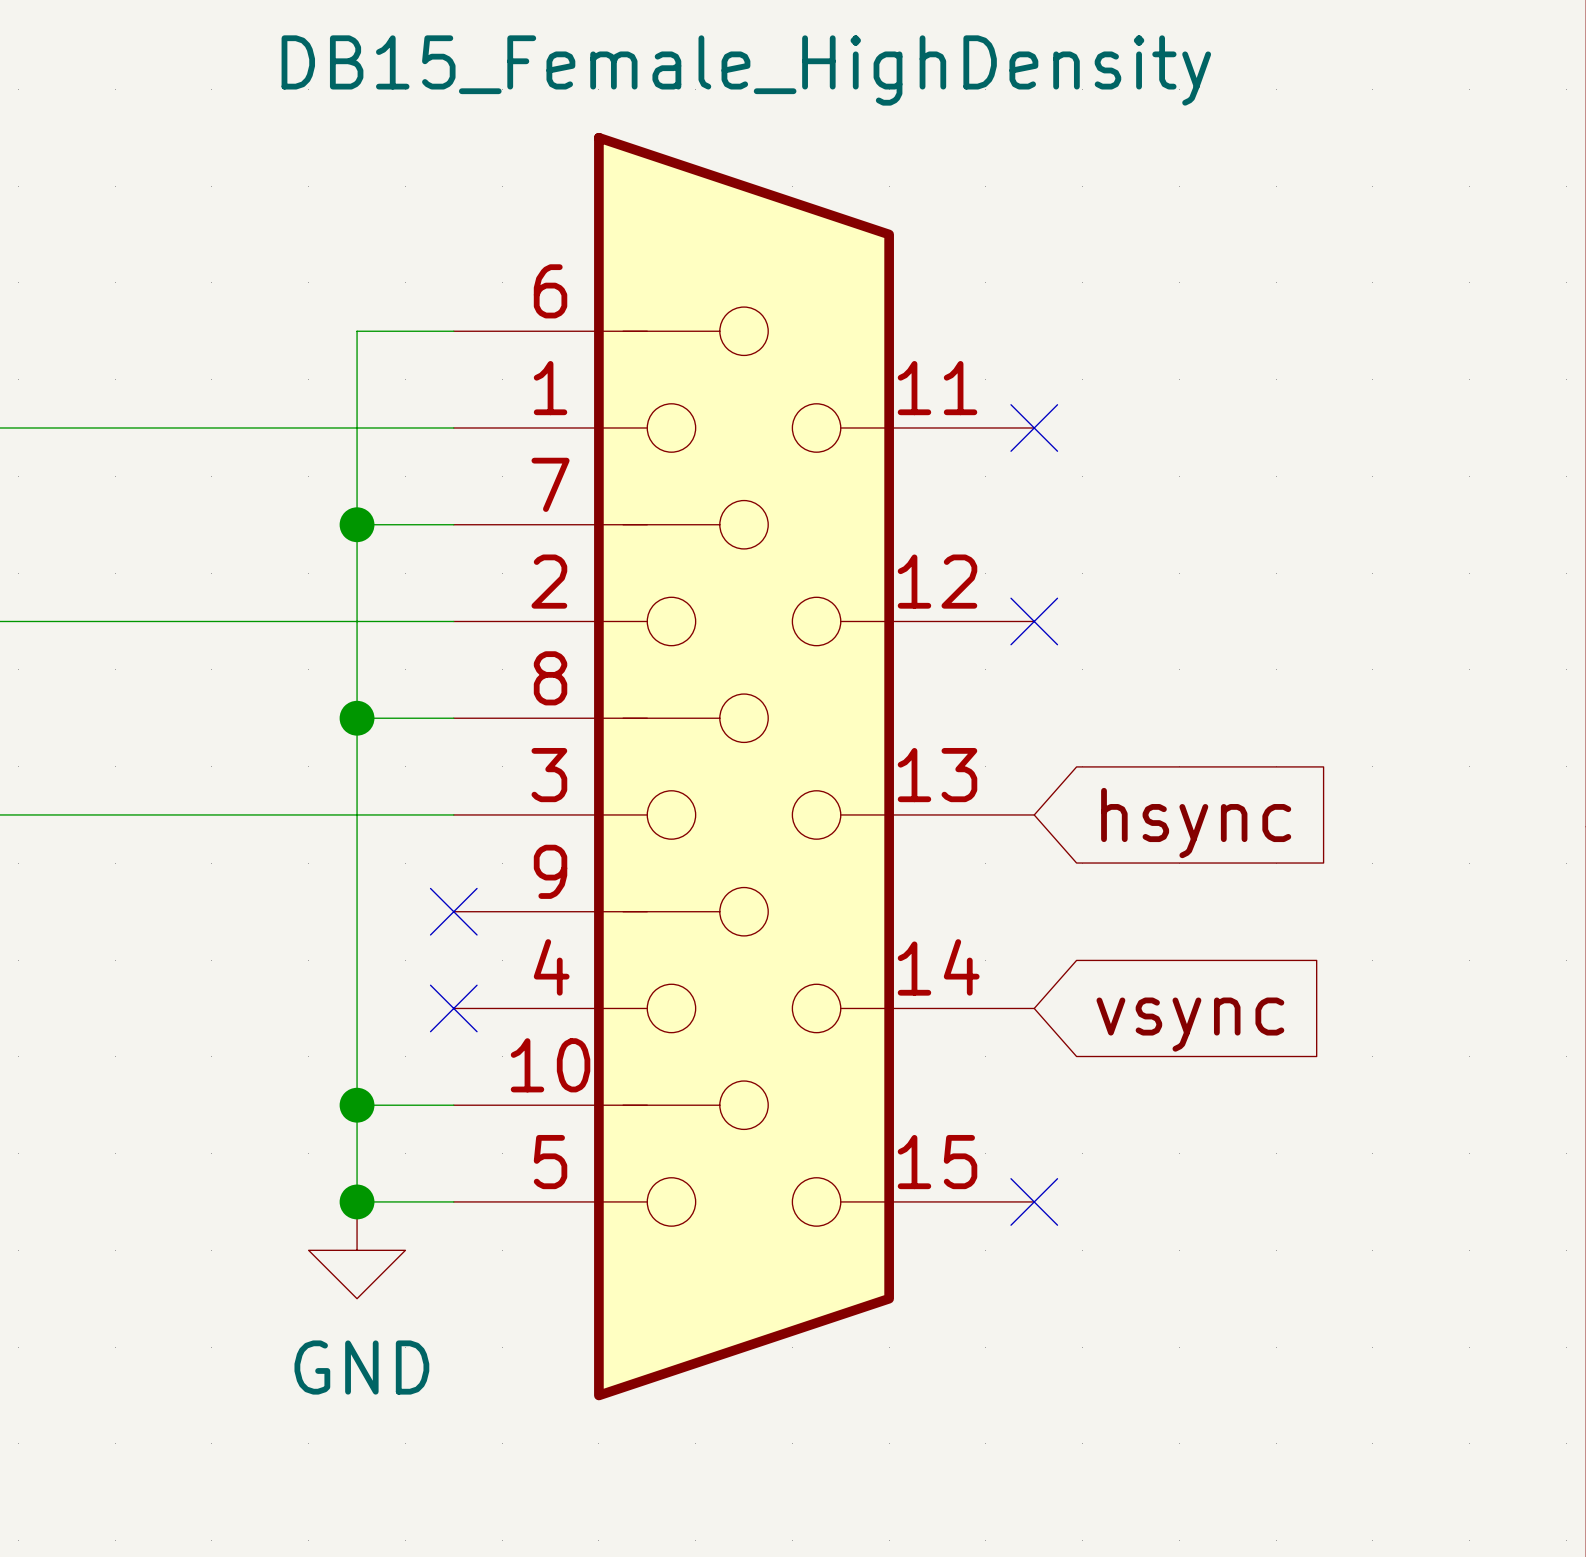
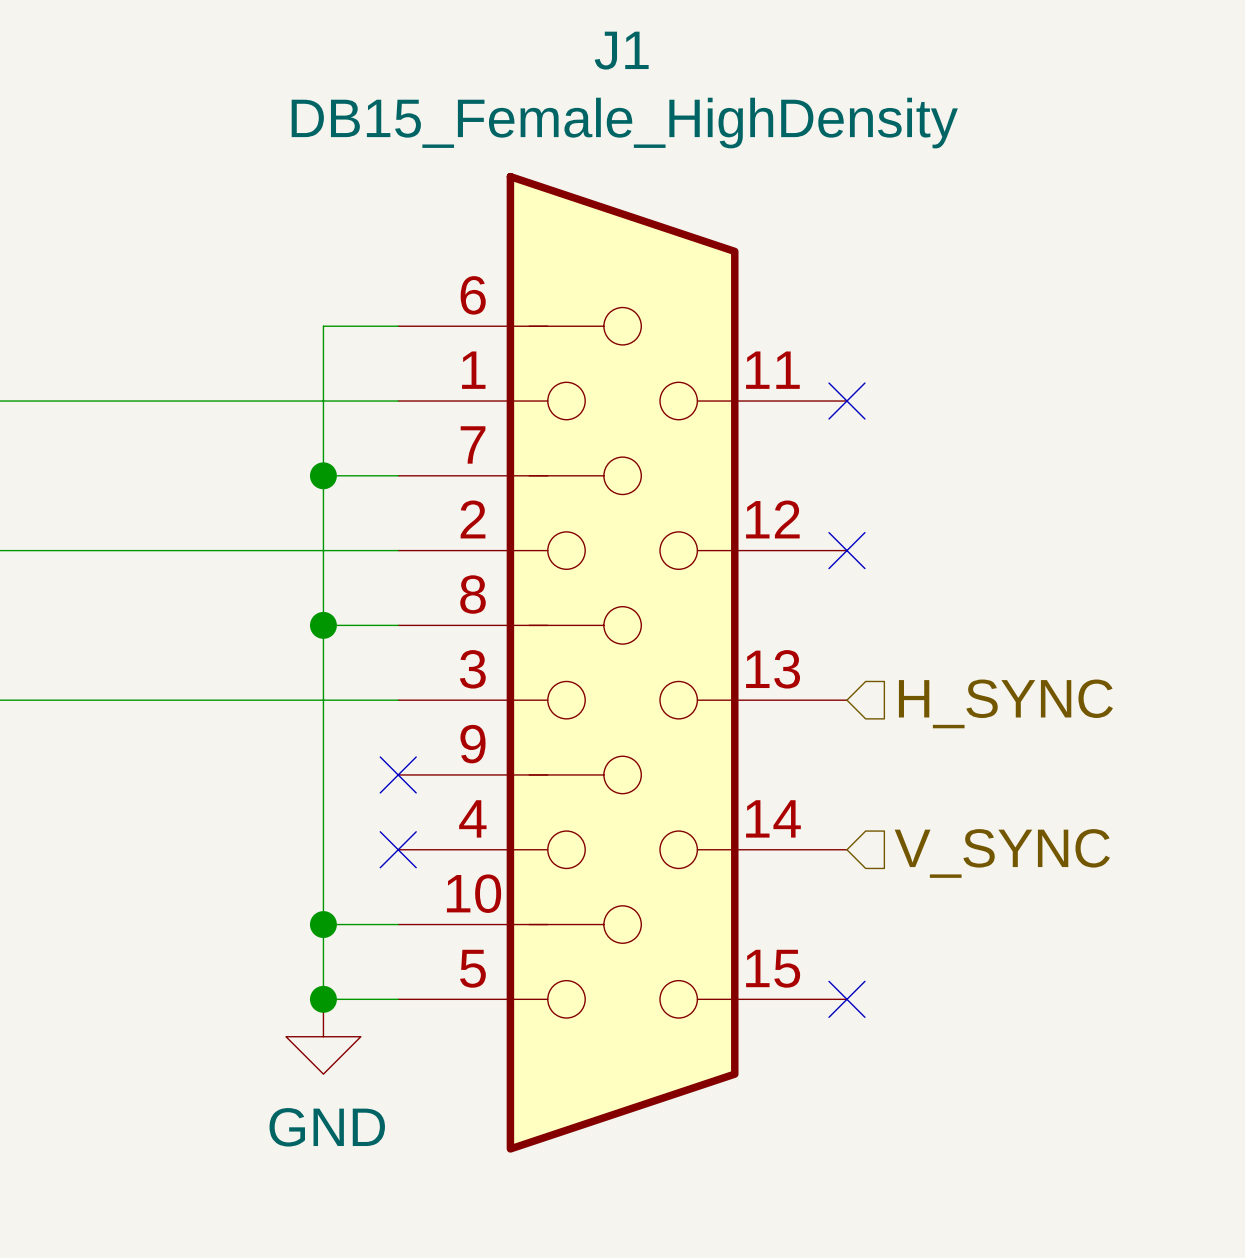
hierarchical label: none -> H_SYNC (1005, 703)
global label: hsync (1196, 823) -> none
hierarchical label: none -> V_SYNC (1002, 853)
global label: vsync (1190, 1024) -> none

